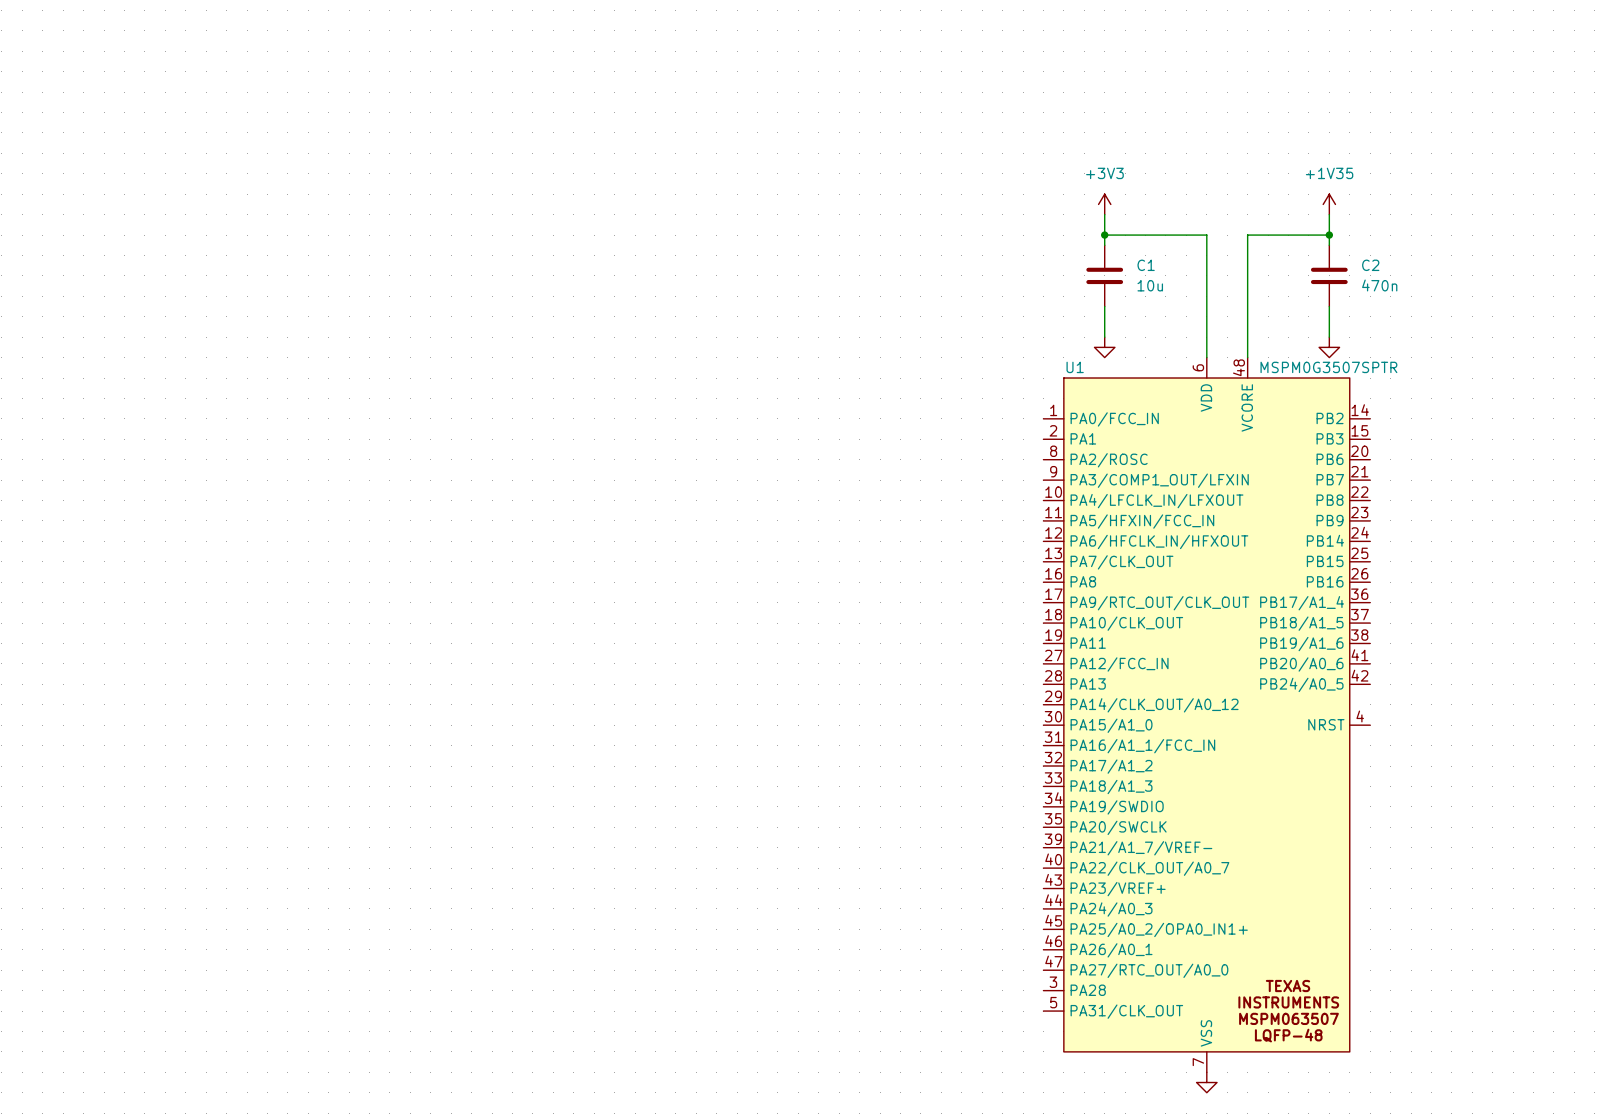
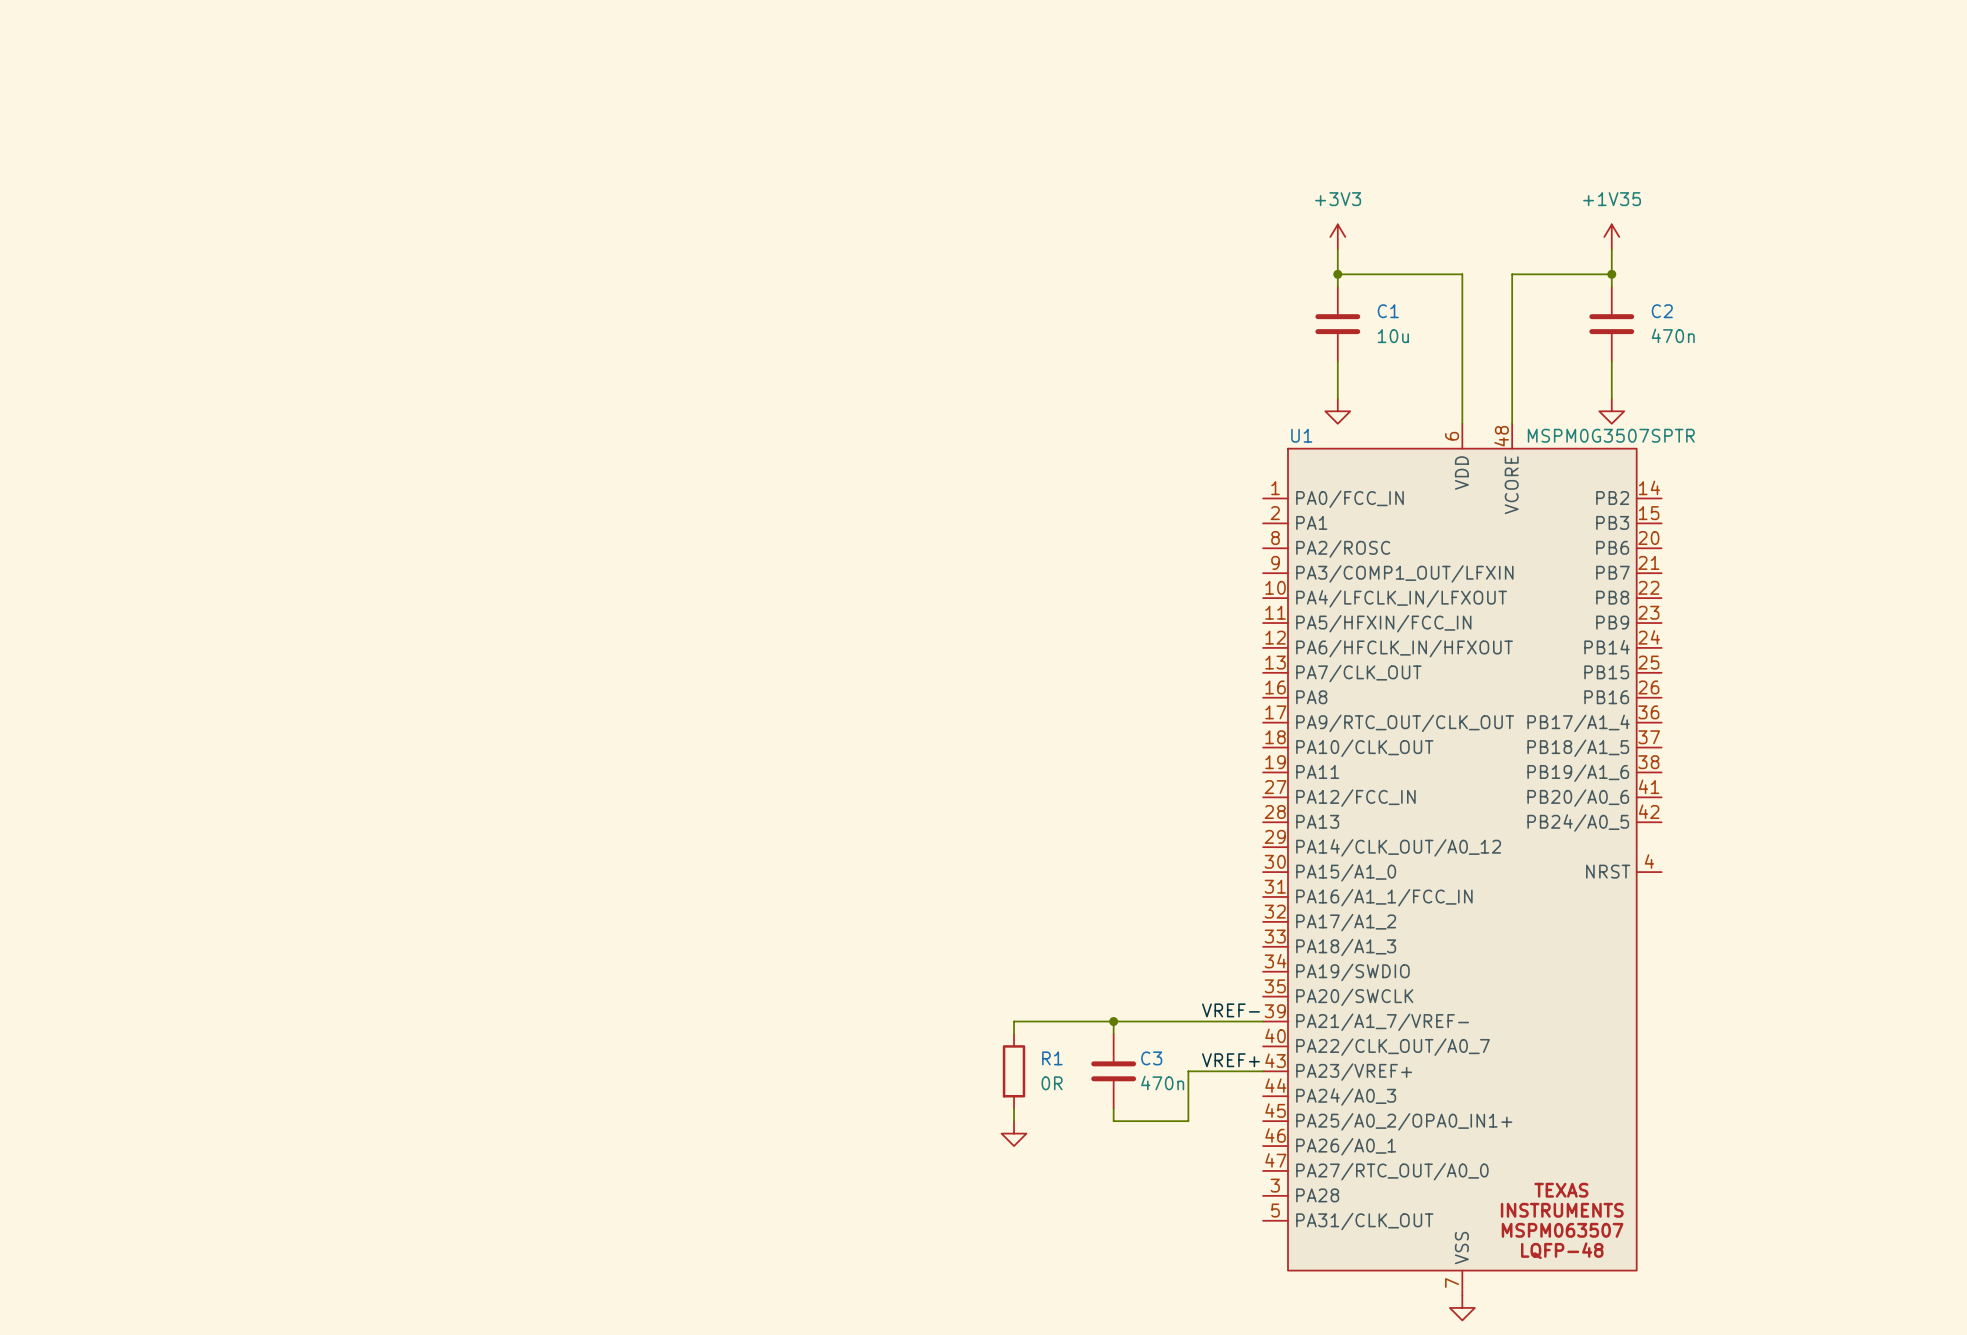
label: none -> VREF- (1230, 1010)
wire: none -> (1113, 1021) (1113, 1033)
junction: none -> (1113, 1021)
wire: none -> (1263, 1021) (1014, 1021) (1014, 1033)
label: none -> VREF+ (1230, 1060)
R1: none -> 0R (1014, 1071)
C3: none -> 470n (1113, 1071)
wire: none -> (1263, 1071) (1188, 1071) (1188, 1121) (1113, 1121) (1113, 1108)
wire: none -> (1014, 1108) (1014, 1121)
power symbol: none -> (1014, 1133)

